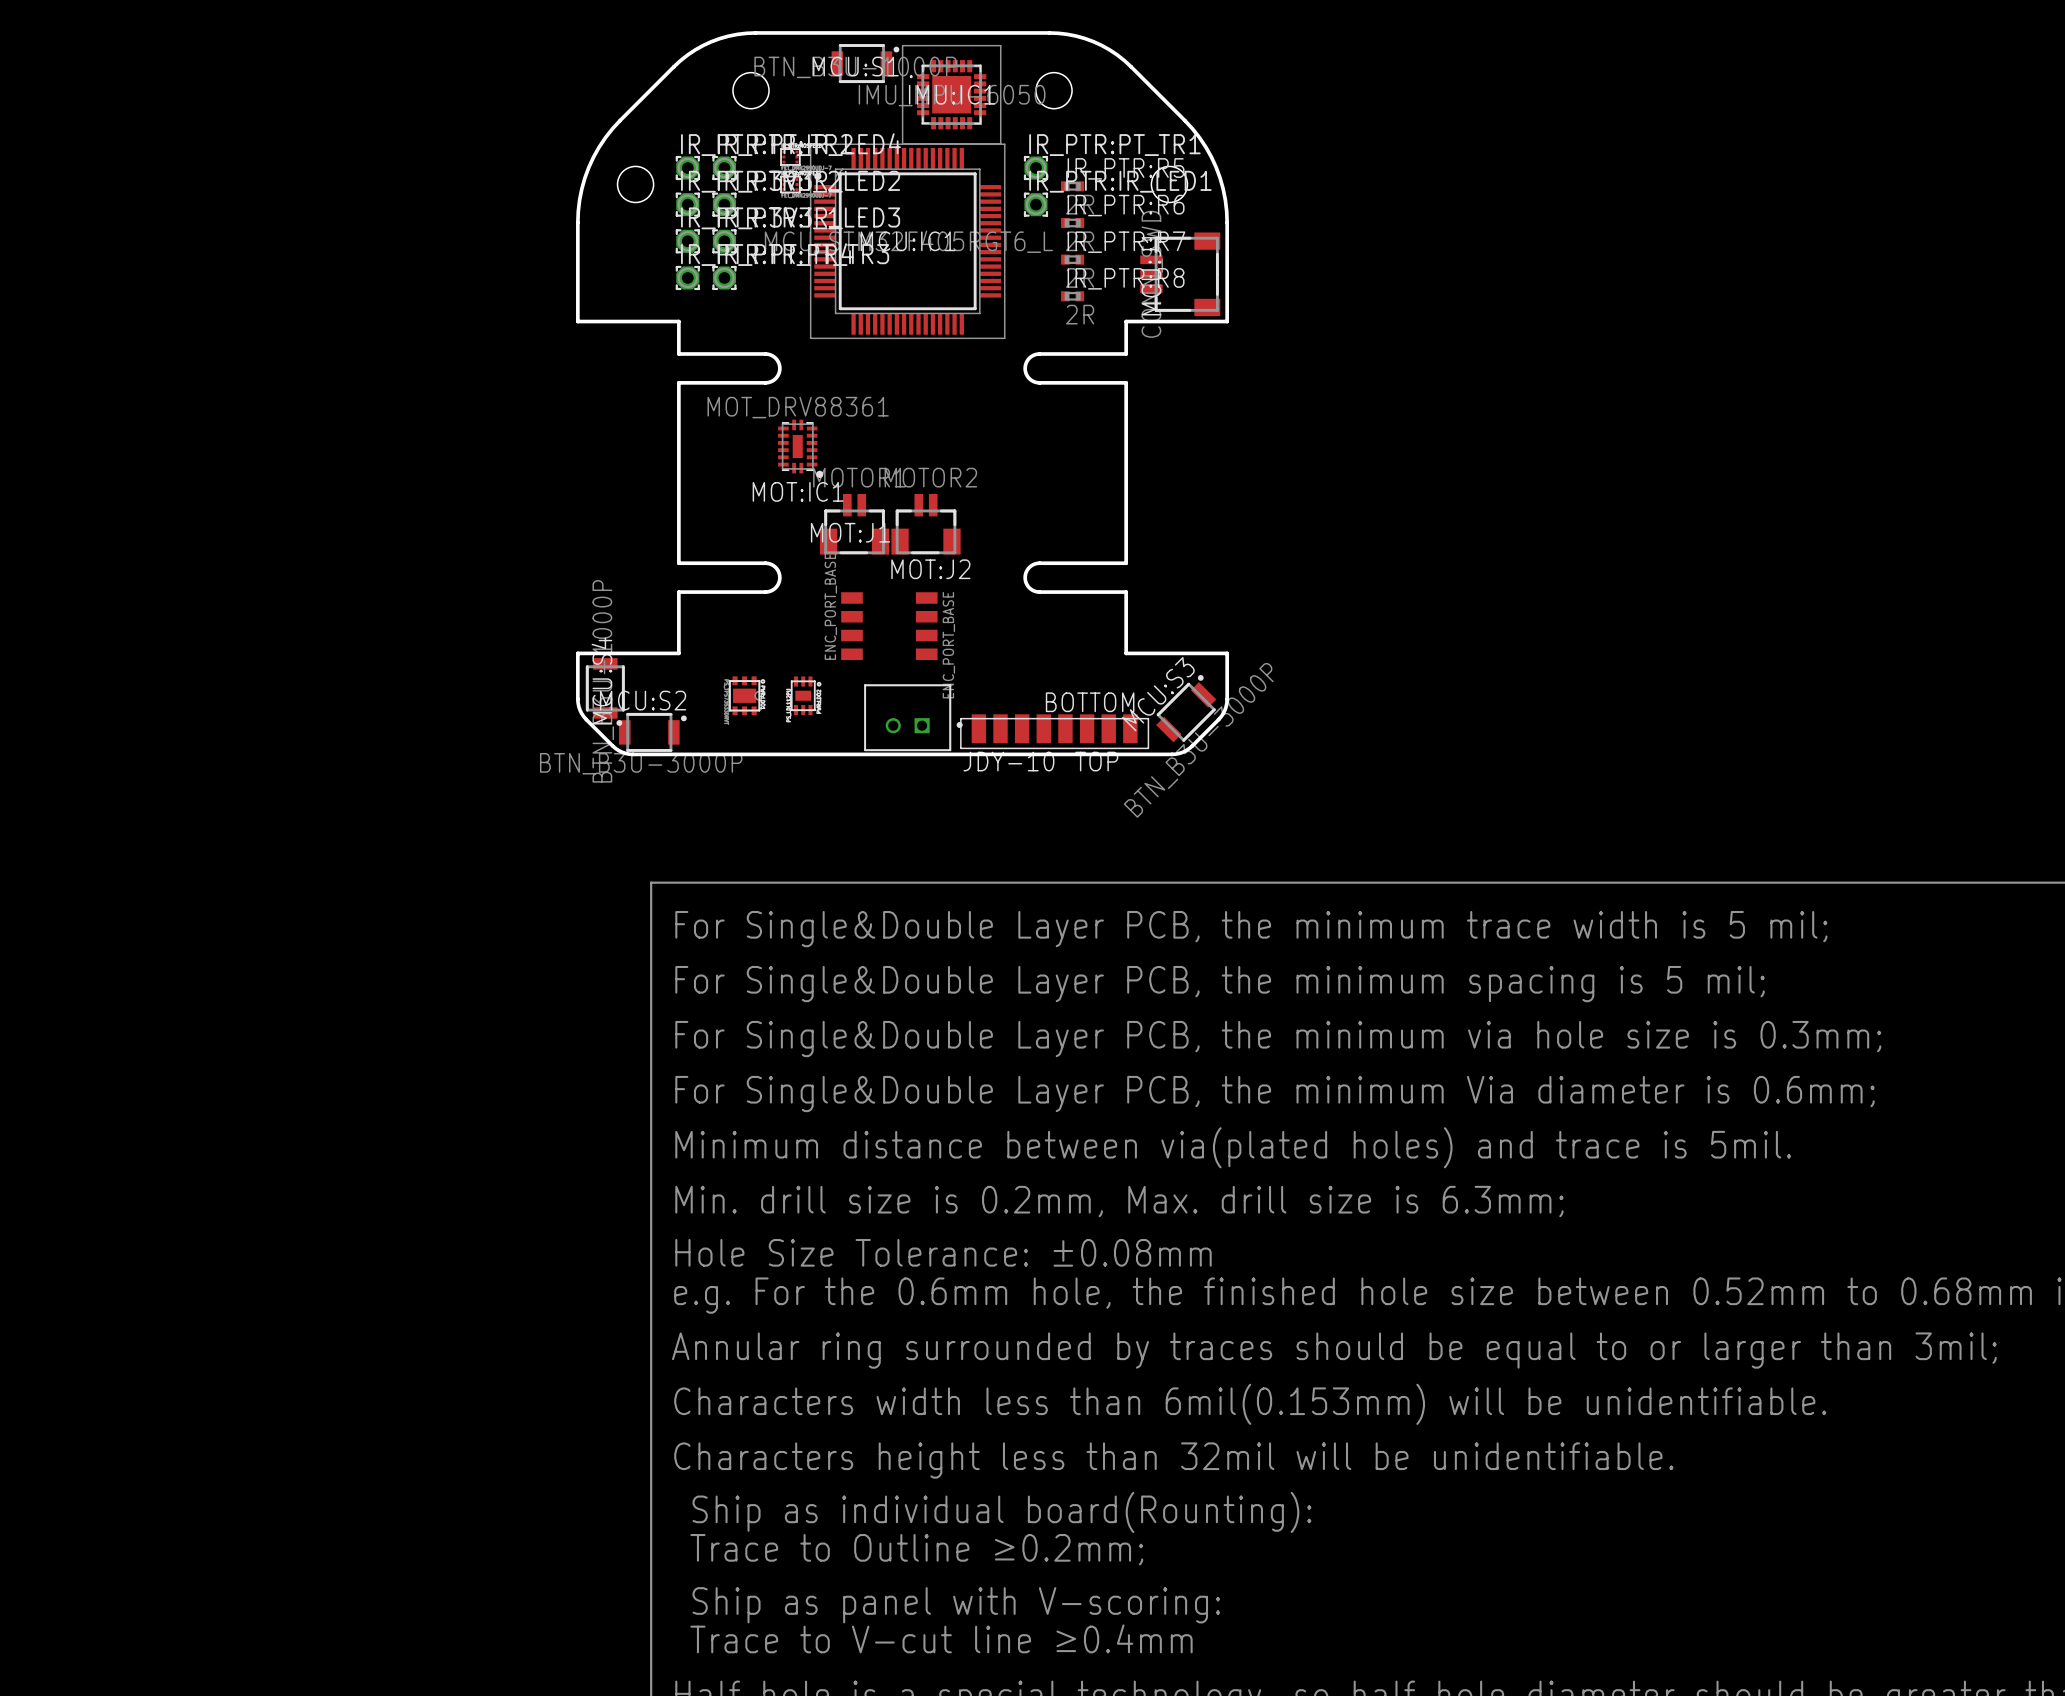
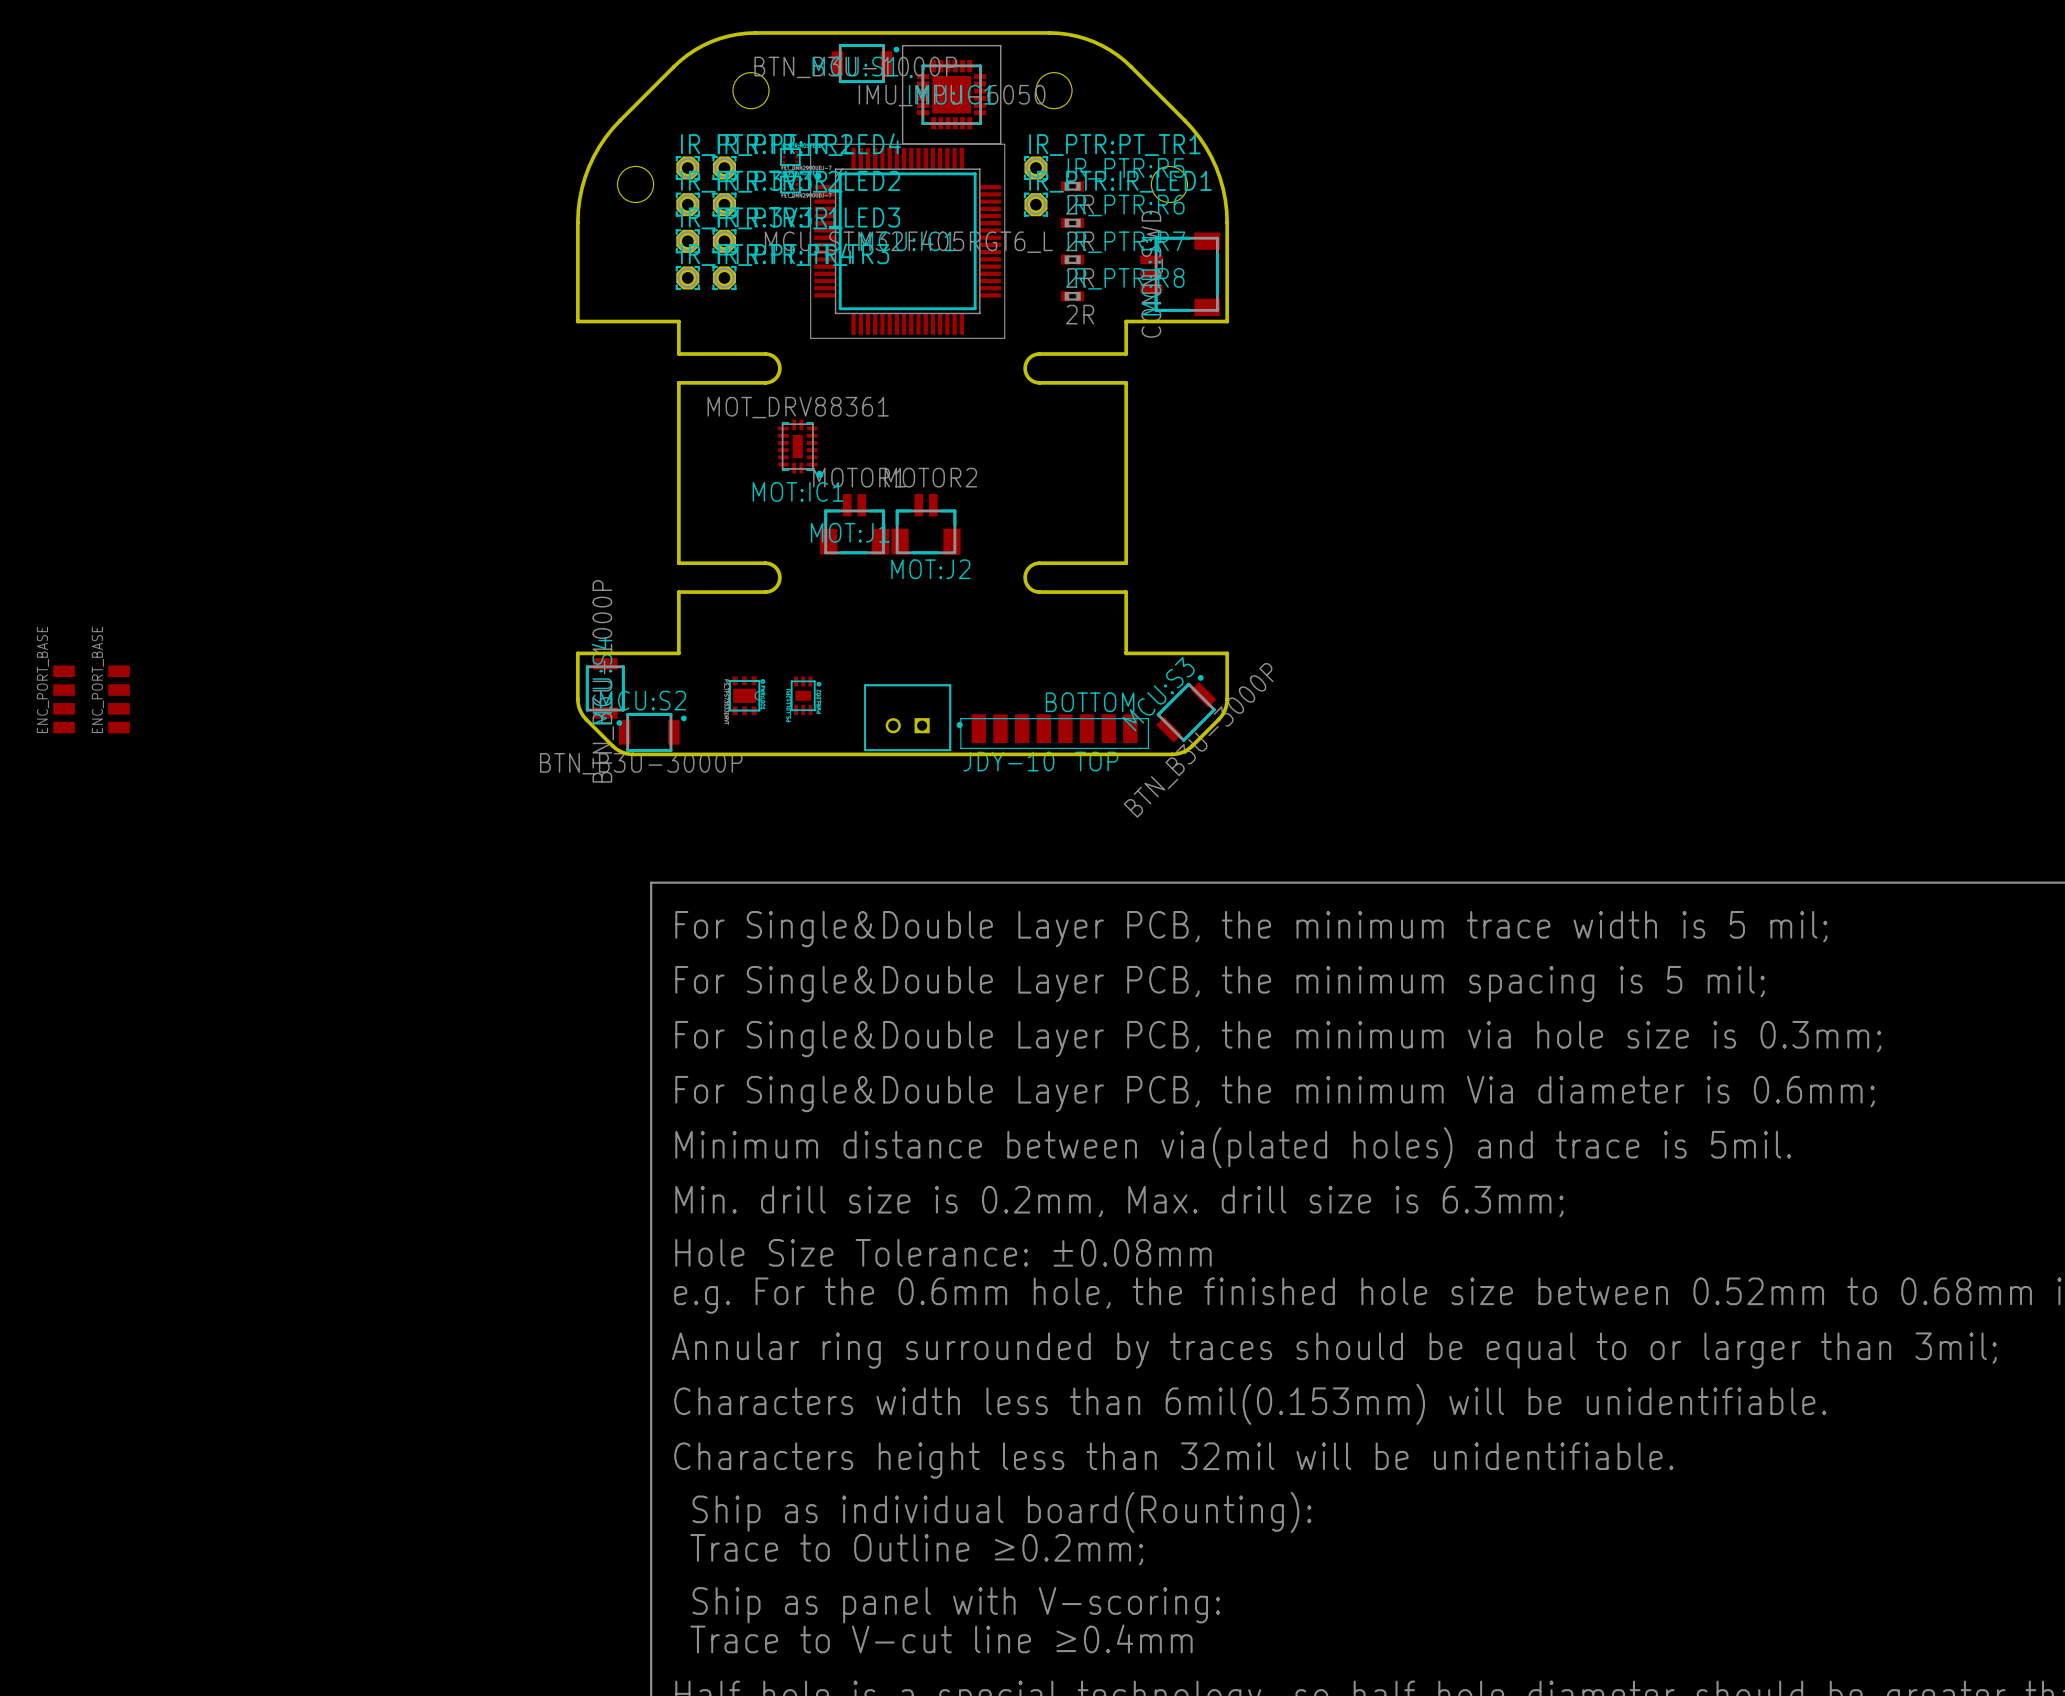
part: ENC_PORT_BASE (852, 626) -> none
part: ENC_PORT_BASE (926, 626) -> none
part: none -> ENC_PORT_BASE (64, 699)
part: none -> ENC_PORT_BASE (119, 699)

